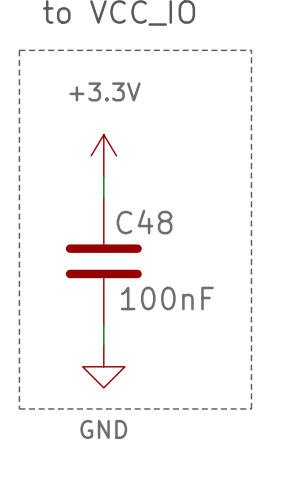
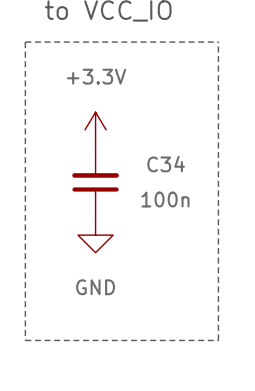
C34: none -> 100n (95, 182)
C48: 100nF (103, 261) -> none
wire: (103, 324) (103, 345) -> none
power symbol position: GND (103, 366) -> GND (95, 235)

